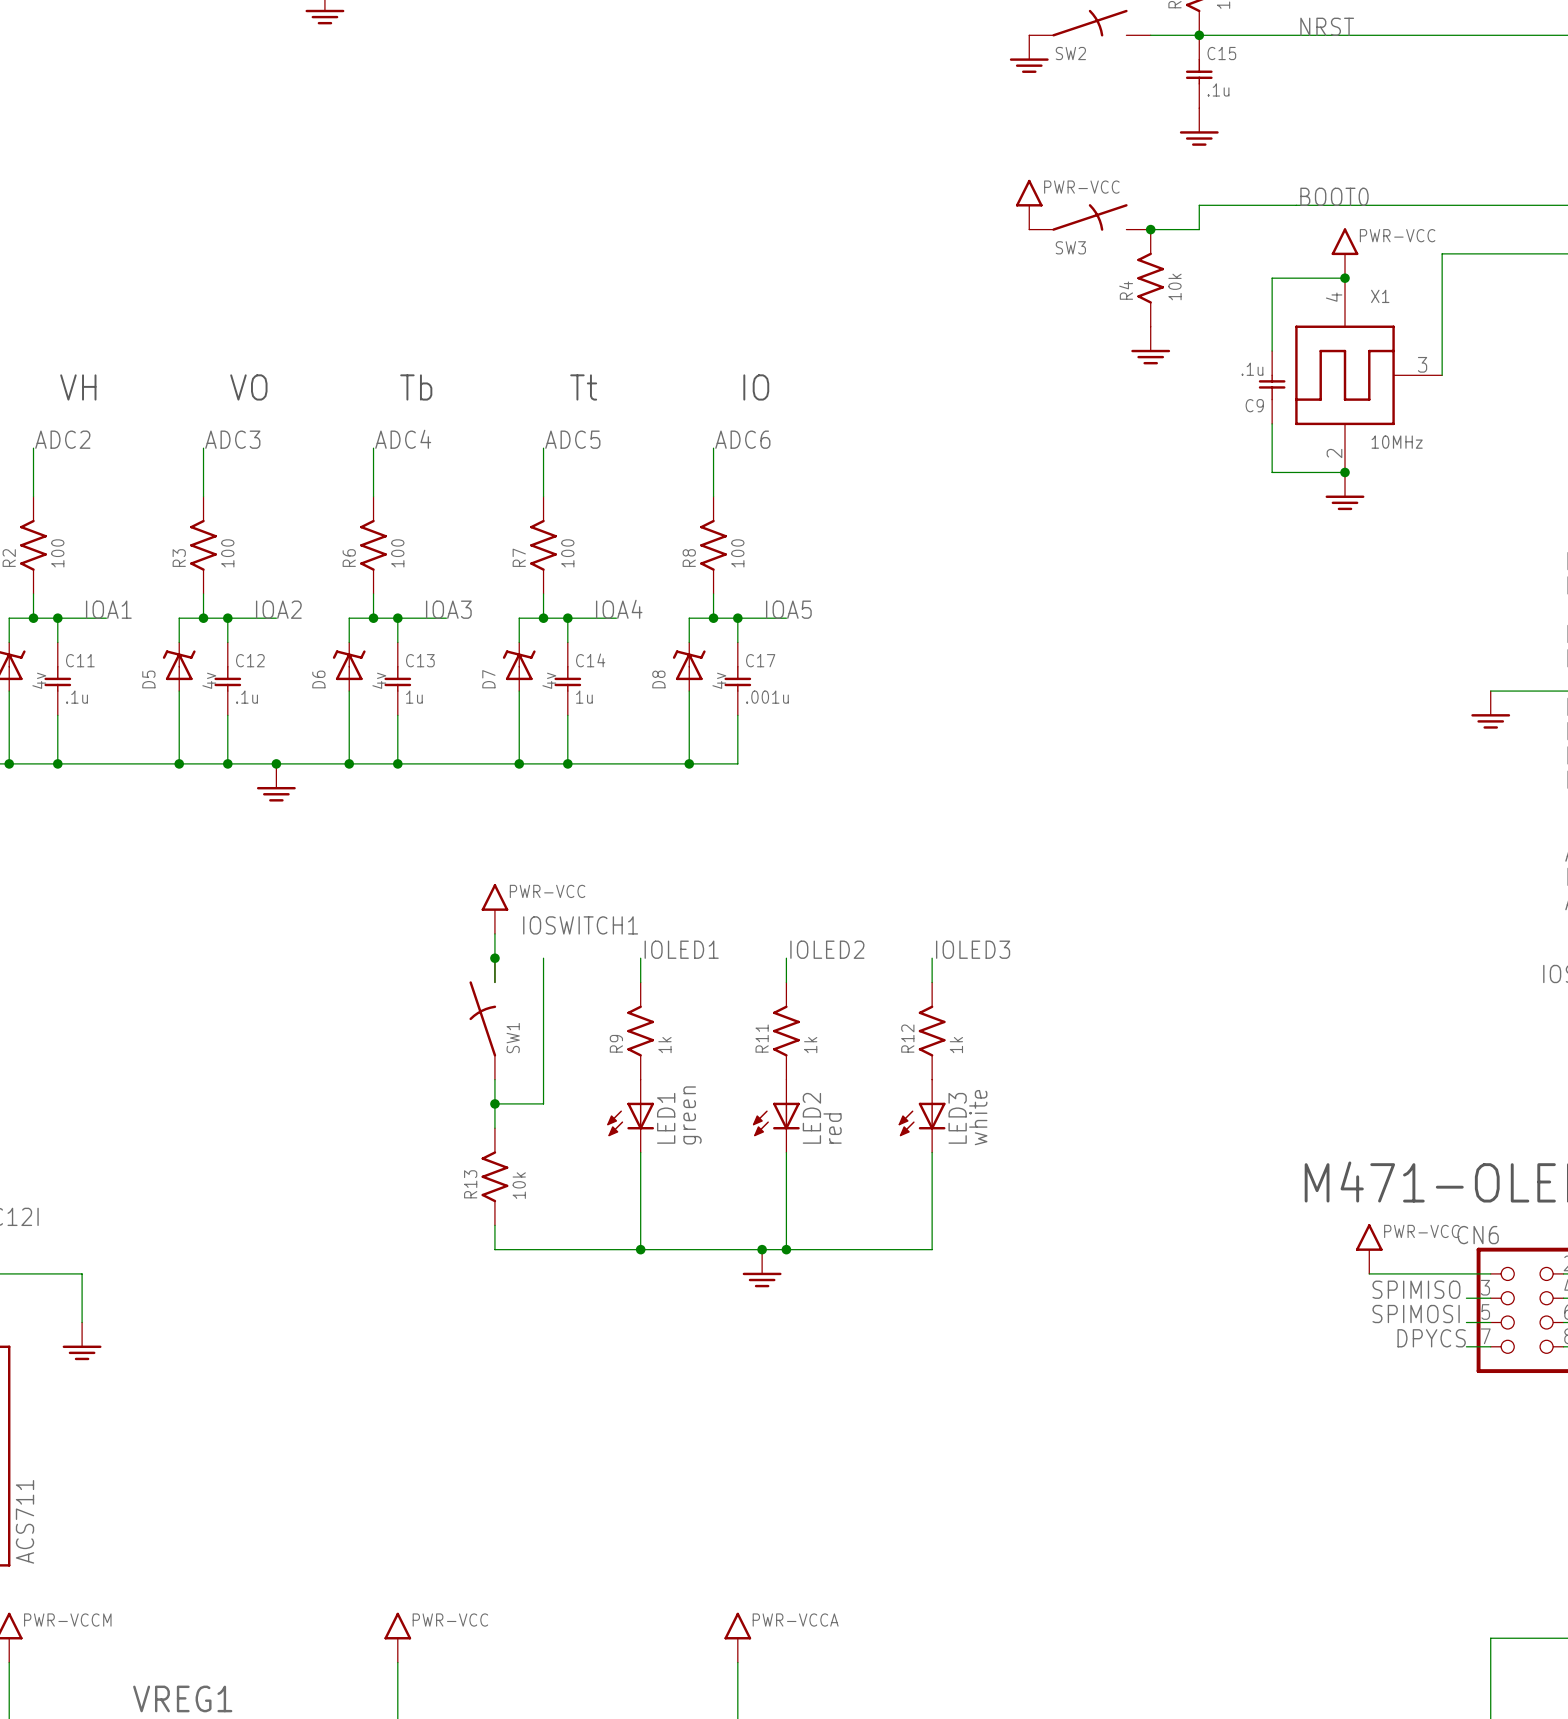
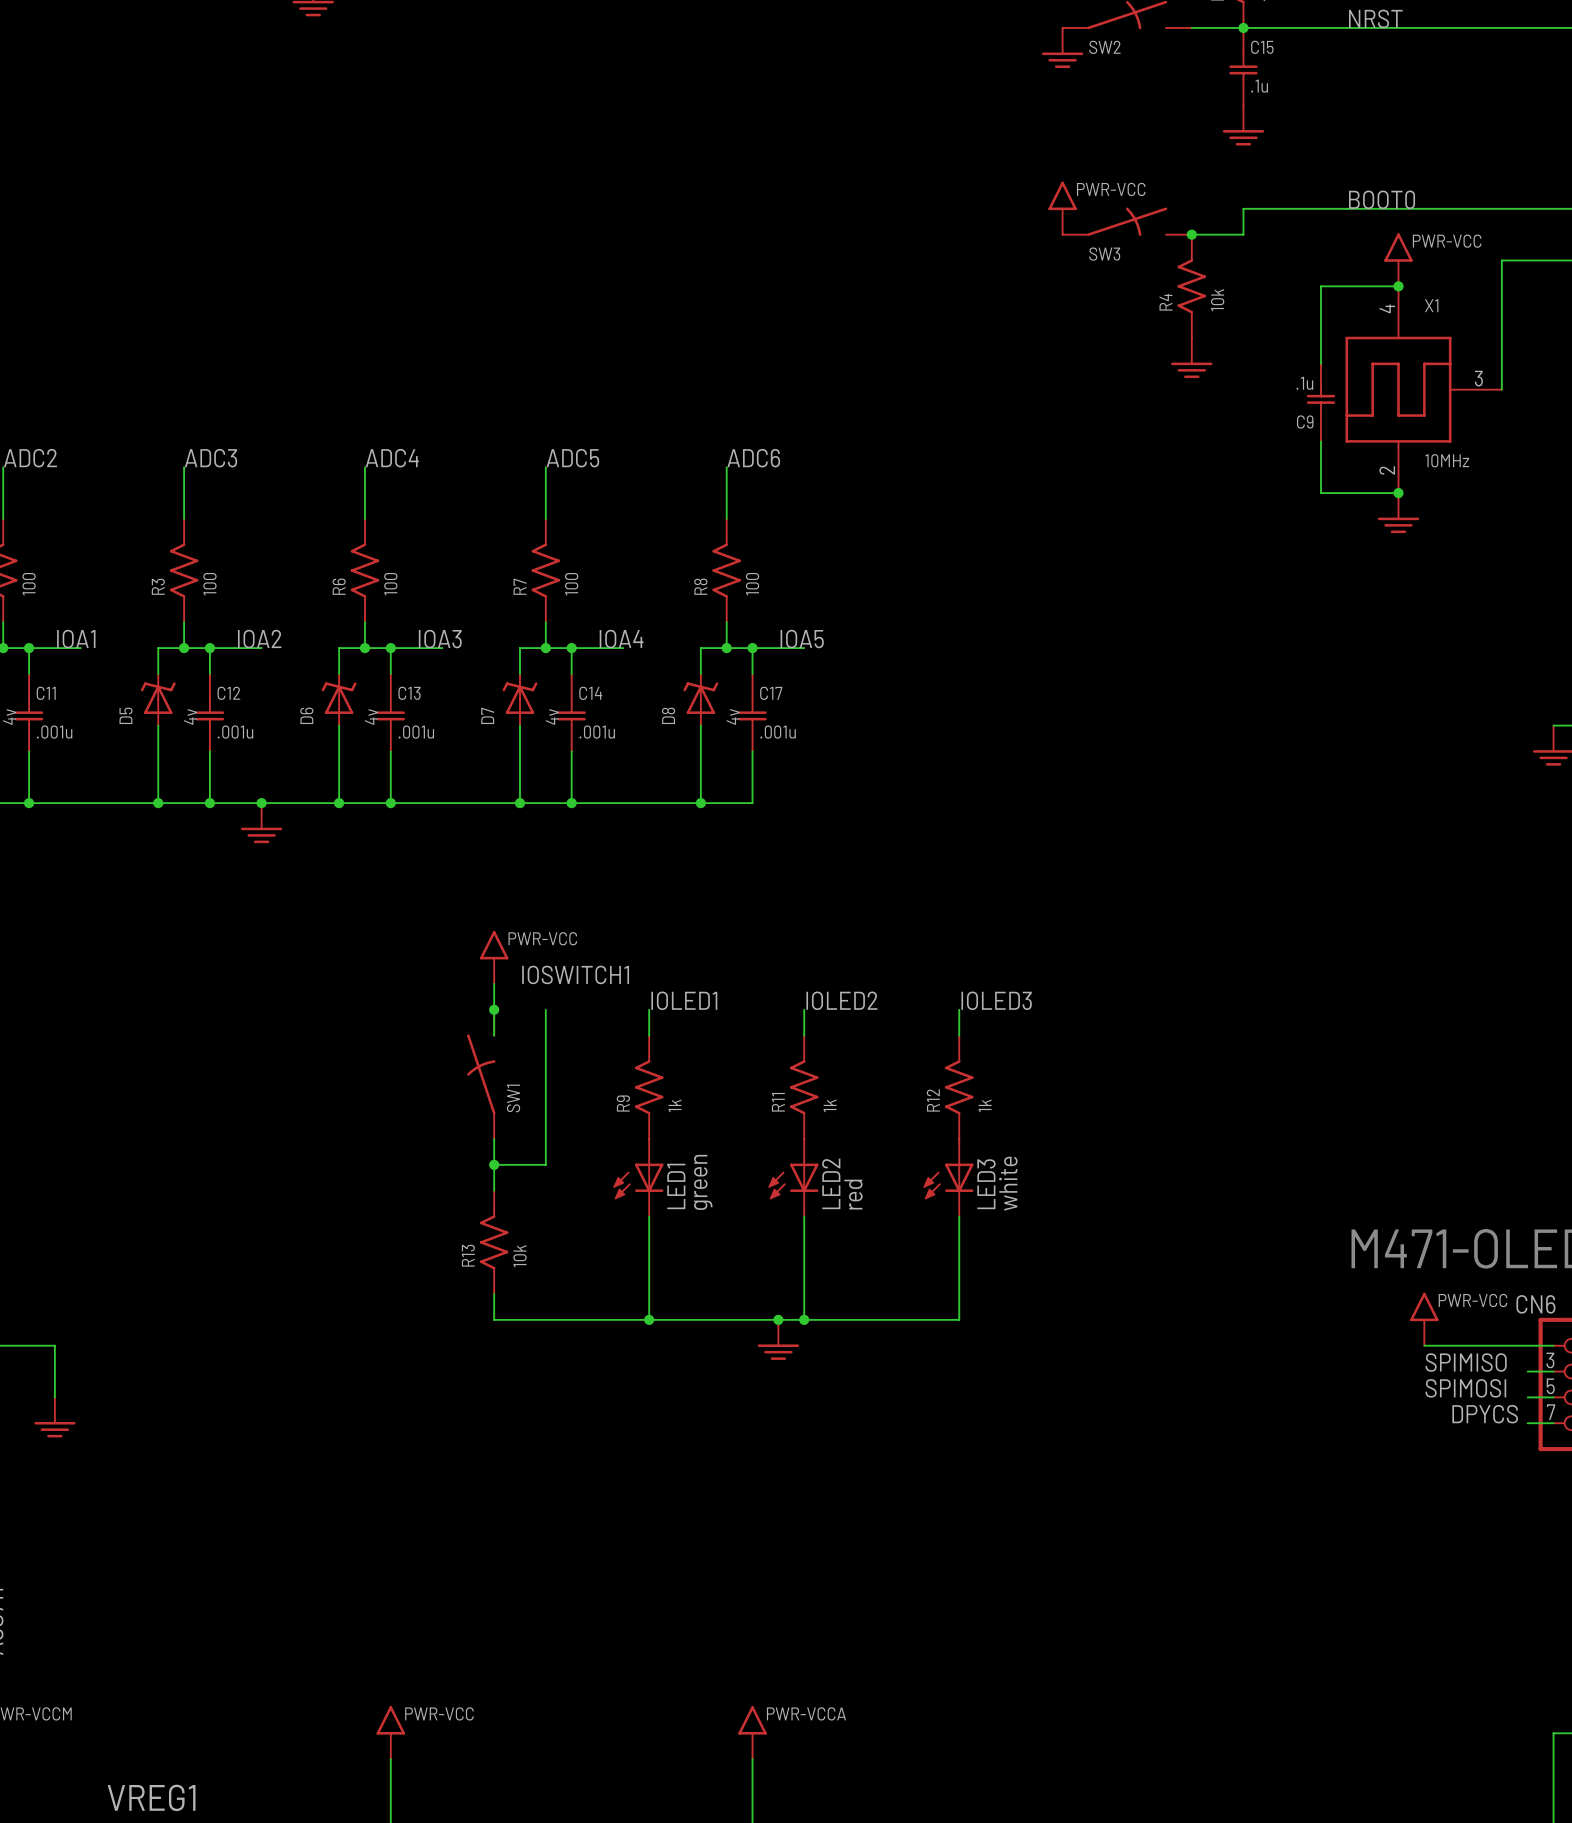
text: VH (78, 387) -> none
text: VO (248, 387) -> none
text: Tb (416, 387) -> none
text: Tt (583, 387) -> none
text: IO (756, 387) -> none
C11 value: .1u (76, 697) -> .001u (54, 732)
C12 value: .1u (247, 697) -> .001u (235, 732)
C13 value: 1u (414, 697) -> .001u (416, 732)
C14 value: 1u (584, 697) -> .001u (597, 732)

